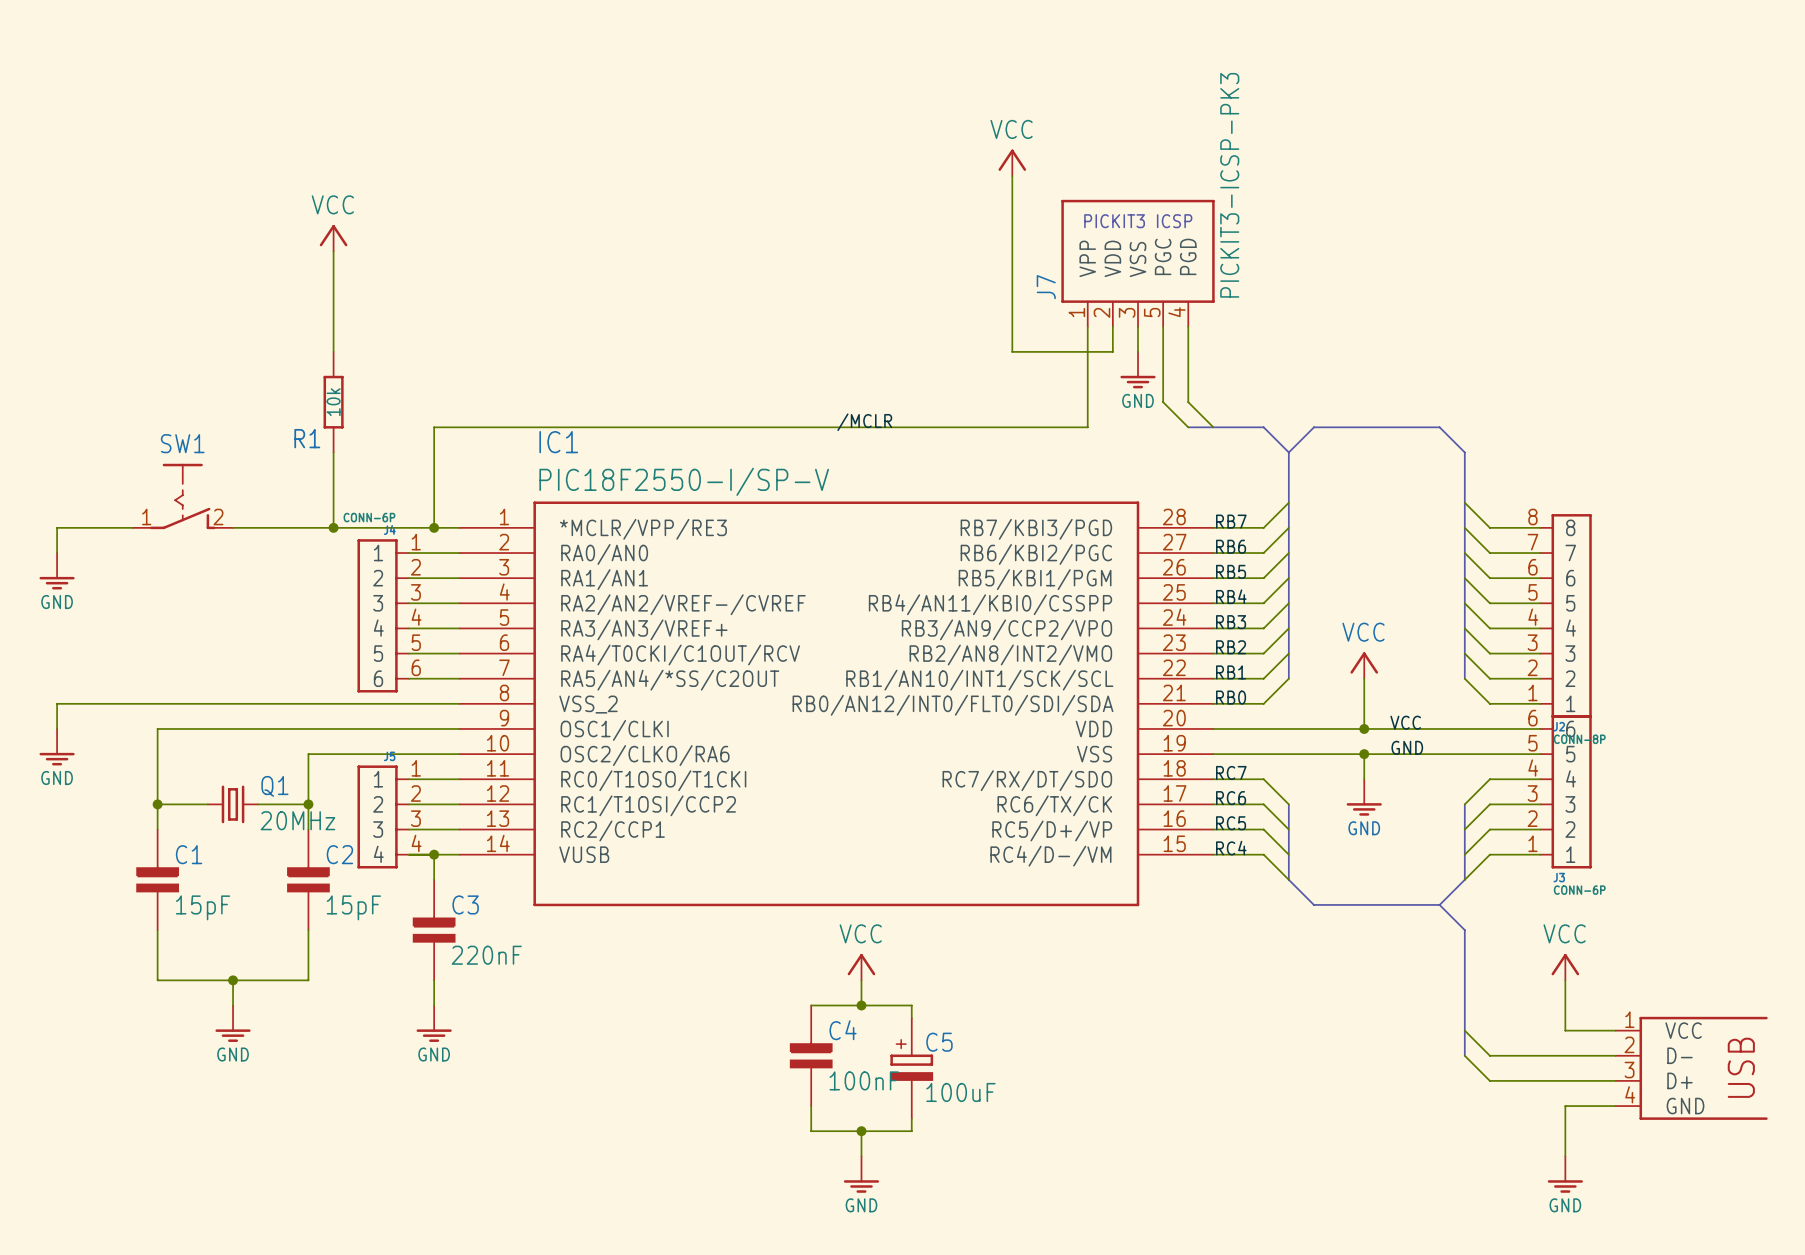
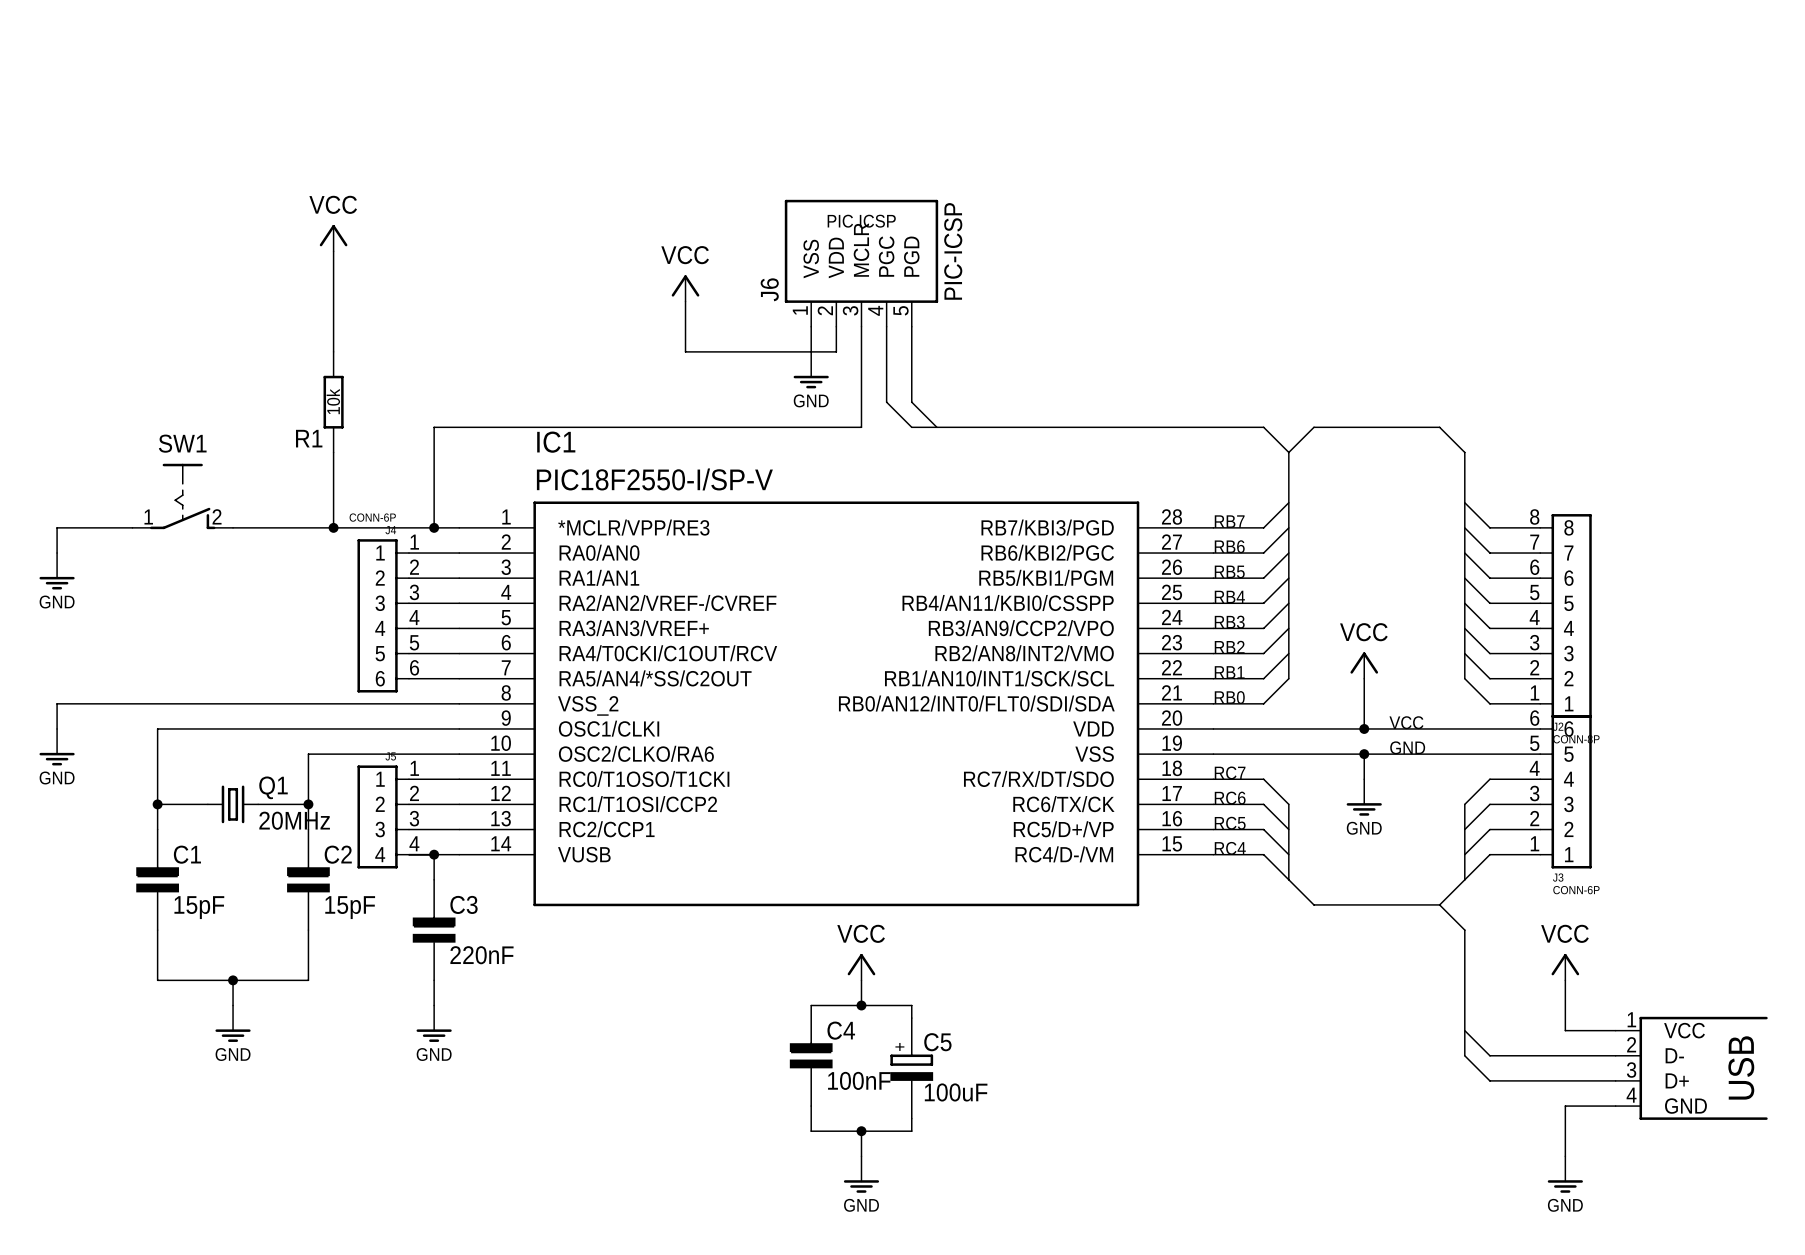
power symbol: VCC (1012, 162) -> none
wire: (1012, 175) (1012, 351) (1112, 351) (1112, 326) -> none
J6: none -> PIC-ICSP (861, 263)
J7: PICKIT3-ICSP-PK3 (1138, 263) -> none
power symbol: none -> VCC (685, 288)
wire: none -> (685, 301) (685, 351) (836, 351) (836, 326)
wire: none -> (811, 326) (811, 351)
wire: none -> (886, 326) (886, 402) (911, 427)
wire: none -> (911, 326) (911, 402) (936, 427)
wire: (1087, 326) (1087, 427) (861, 427) -> (861, 326) (861, 427)
wire: (1138, 326) (1138, 351) -> none
wire: (1163, 326) (1163, 402) (1188, 427) -> none
wire: (1188, 326) (1188, 402) (1213, 427) -> none
power symbol: none -> GND (811, 370)
power symbol: GND (1138, 370) -> none
label: /MCLR (864, 422) -> none
bus: none -> (911, 427) (1188, 427)

